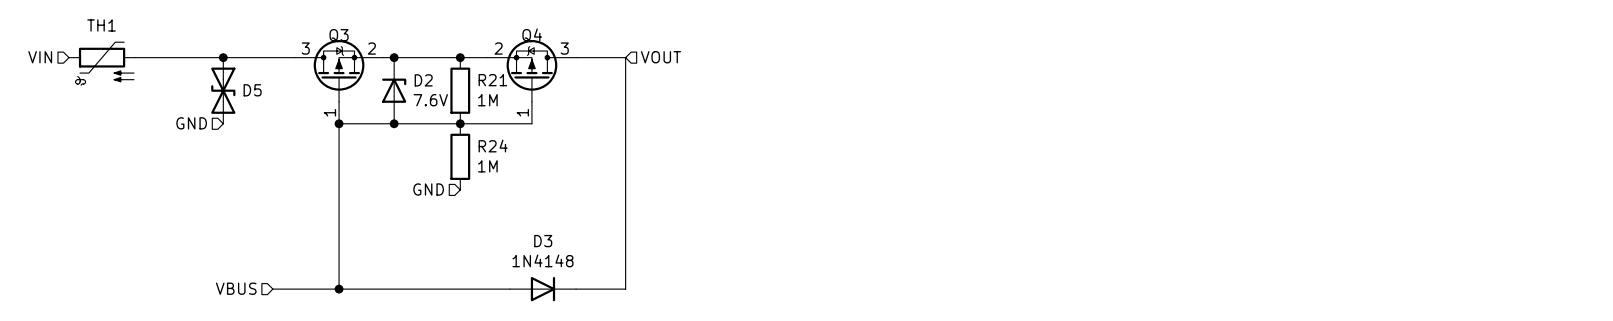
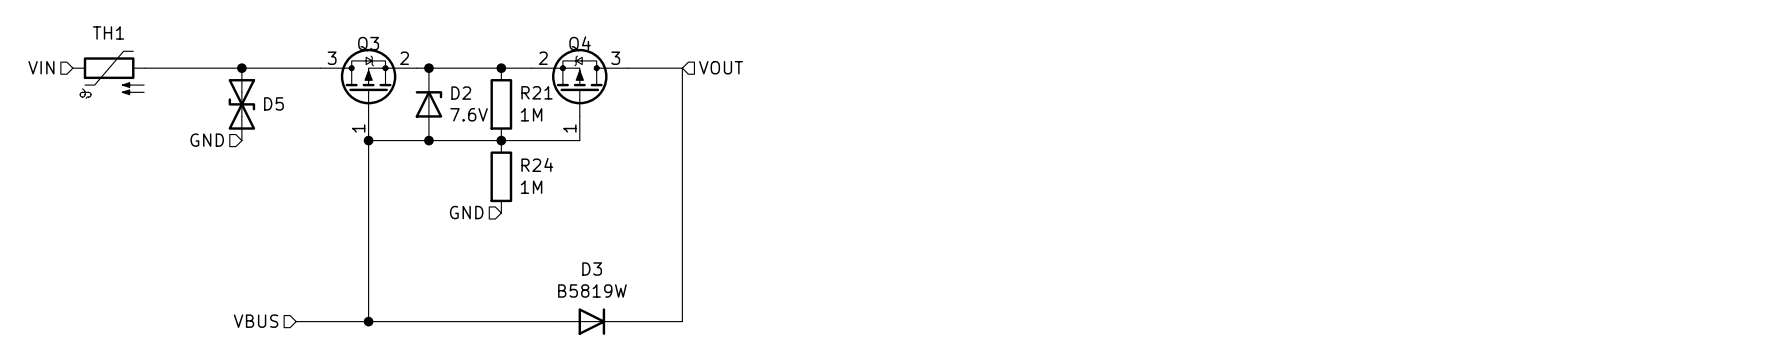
D3 value: 1N4148 (542, 260) -> B5819W (592, 290)

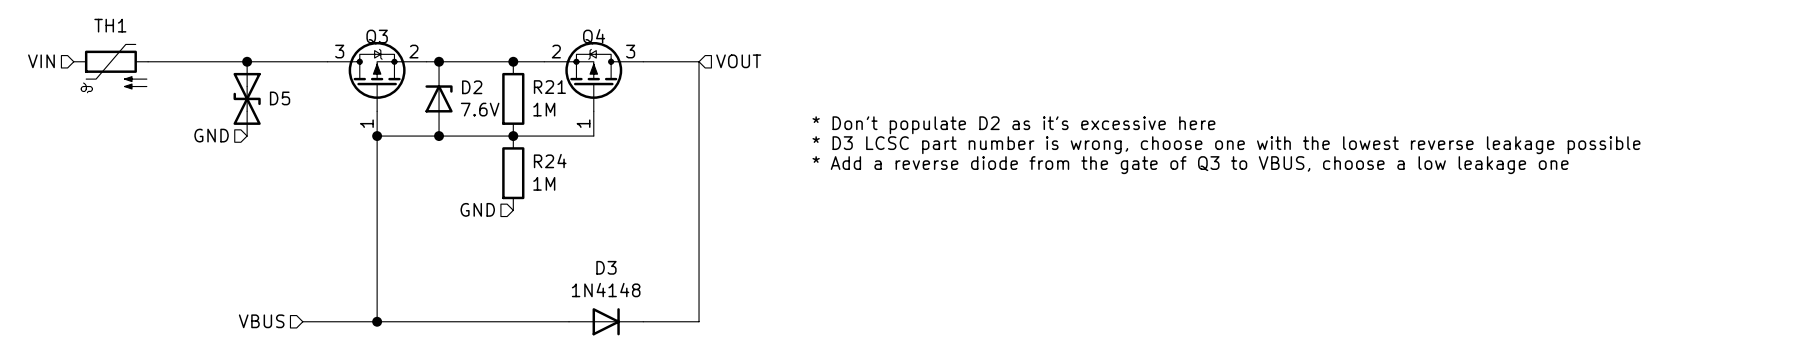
text: none -> * Don't populate D2 as it's excessive here (1013, 125)
text: none -> * D3 LCSC part number is wrong, choose one with the lowest reverse leakage possible (1226, 145)
text: none -> * Add a reverse diode from the gate of Q3 to VBUS, choose a low leakage one (1190, 165)
D3 value: B5819W (592, 290) -> 1N4148 (606, 290)

